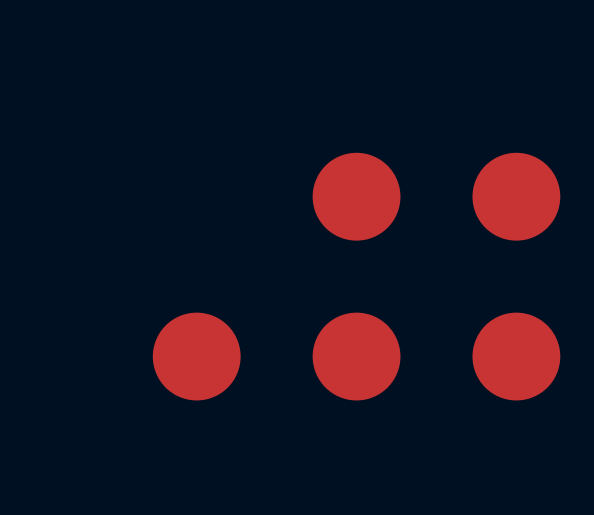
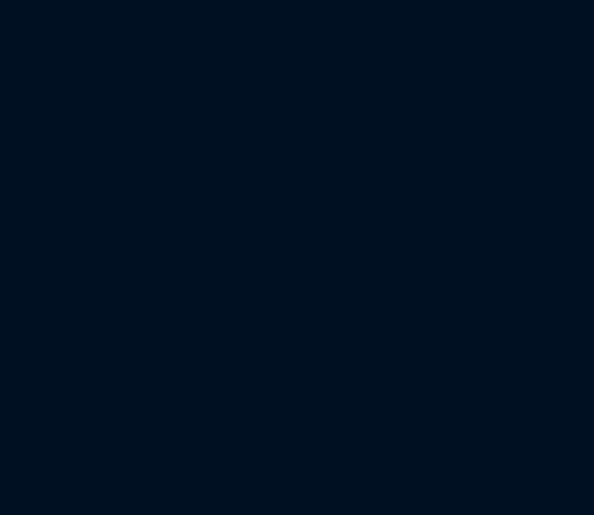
part: (356, 196) -> none
part: (516, 196) -> none
part: (196, 356) -> none
part: (356, 356) -> none
part: (516, 356) -> none

